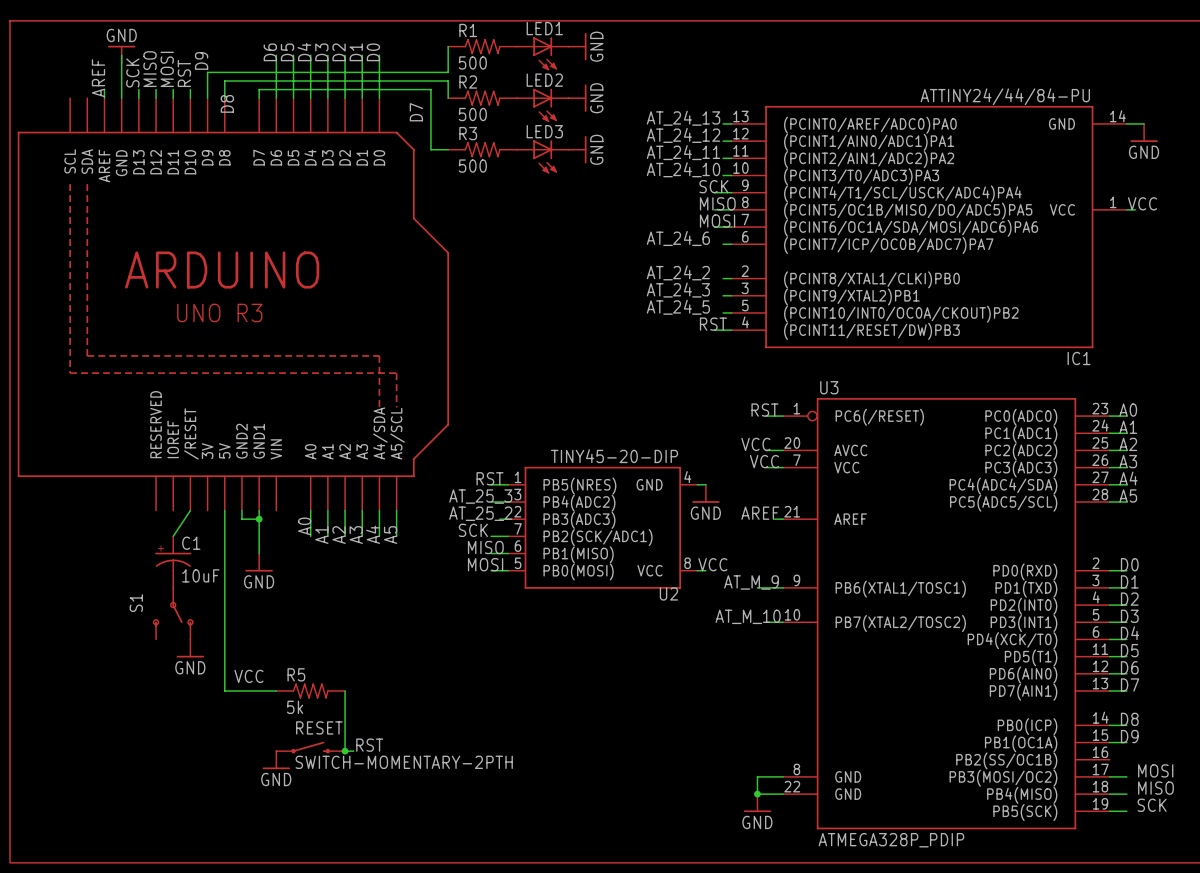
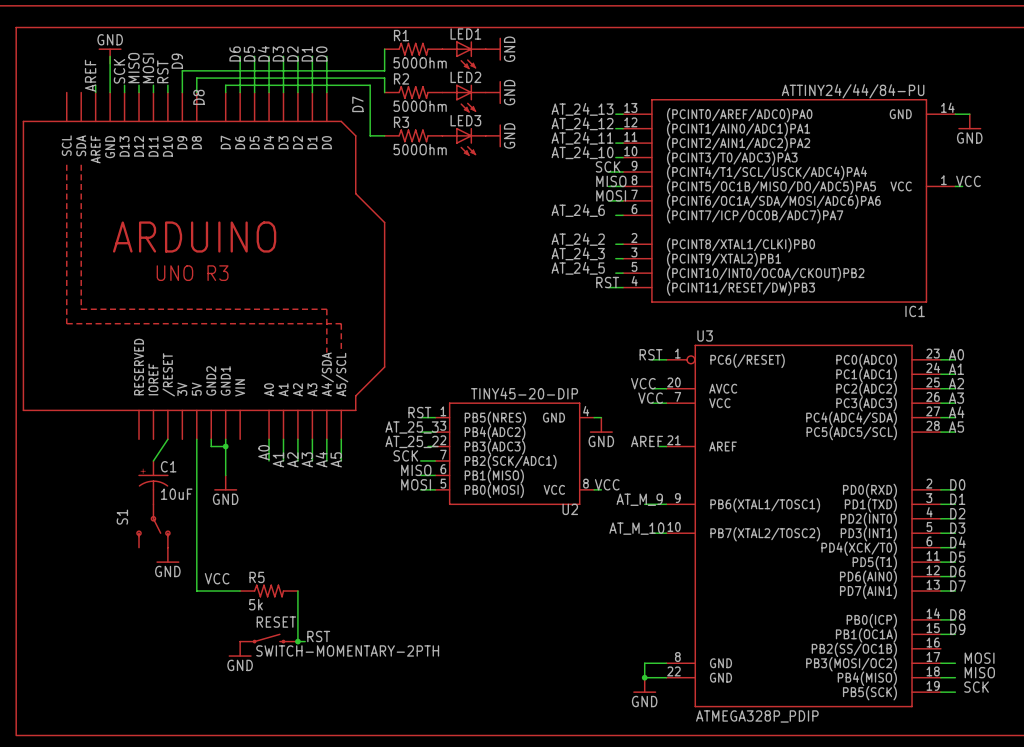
R1 value: 500 (472, 62) -> 500Ohm (420, 62)
R2 value: 500 (472, 114) -> 500Ohm (420, 106)
R3 value: 500 (472, 166) -> 500Ohm (420, 149)

